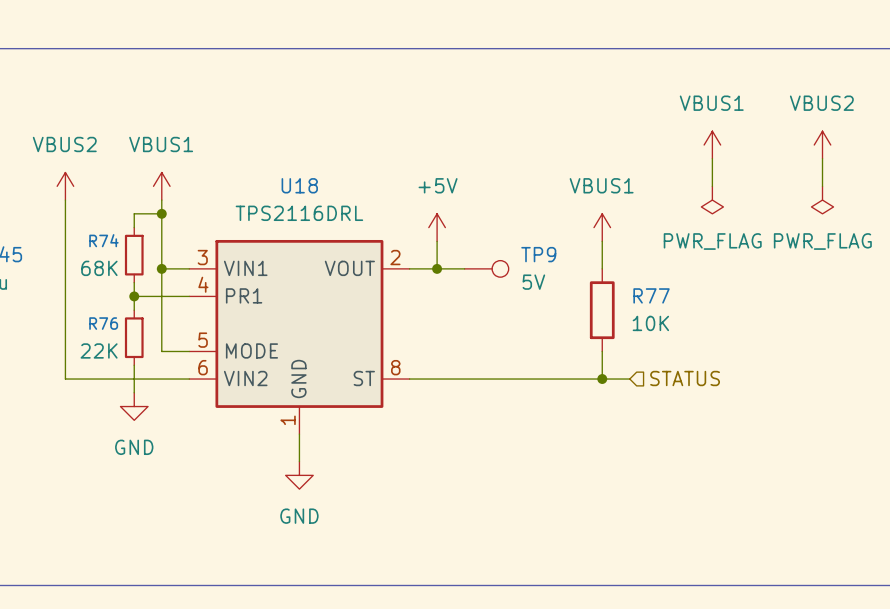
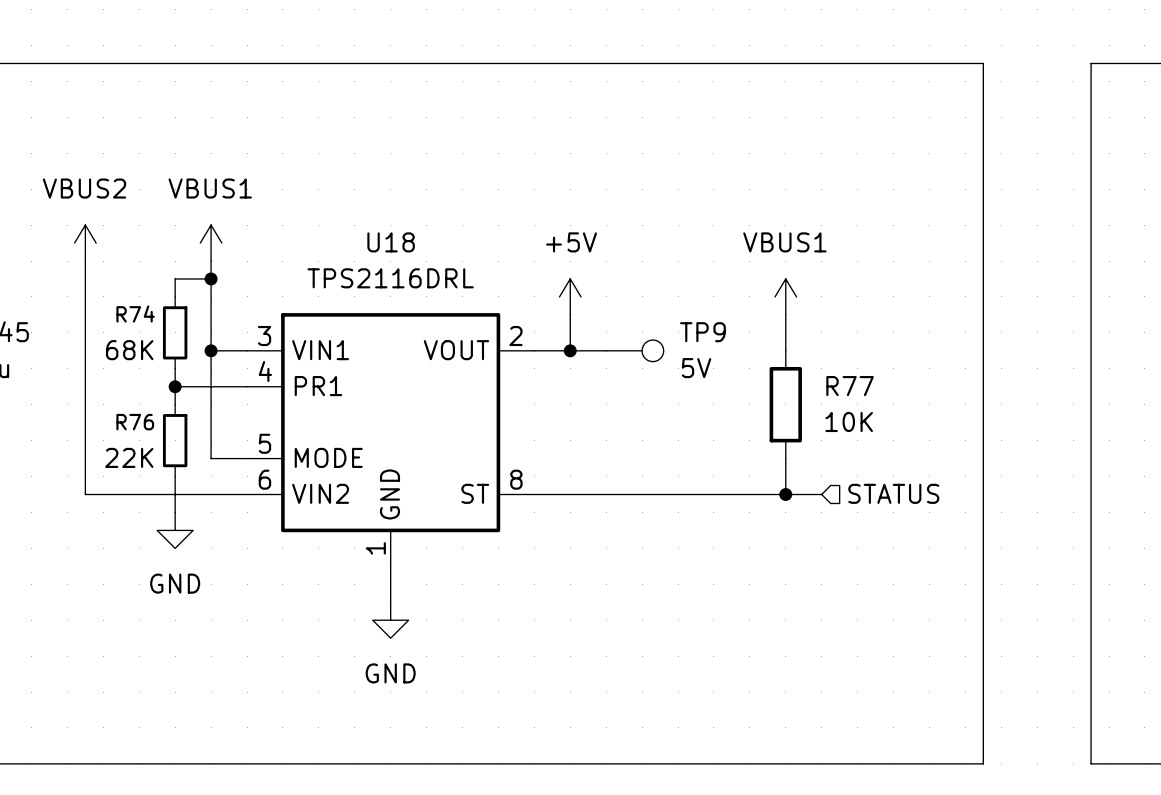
line: (753, 48) (836, 48) -> (983, 63) (983, 763)
power symbol: VBUS1 (712, 145) -> none
power symbol: VBUS2 (822, 145) -> none
wire: (712, 158) (712, 186) -> none
wire: (822, 158) (822, 186) -> none
power symbol: PWR_FLAG (712, 200) -> none
power symbol: PWR_FLAG (822, 200) -> none
line: (753, 585) (836, 585) -> (1091, 63) (1091, 763)

